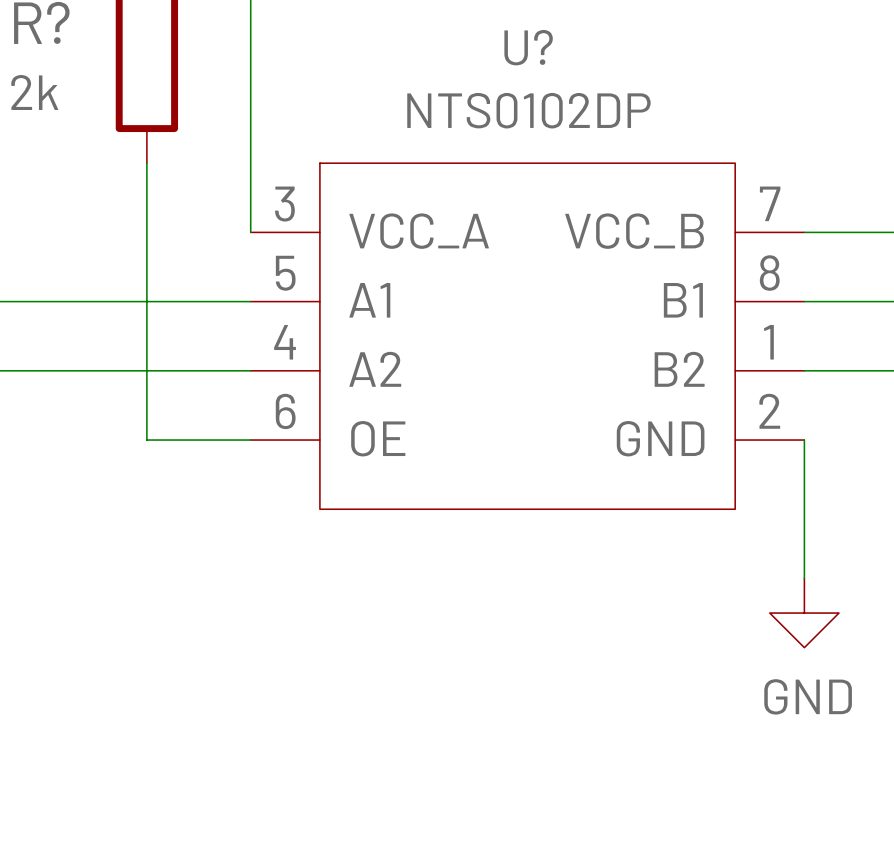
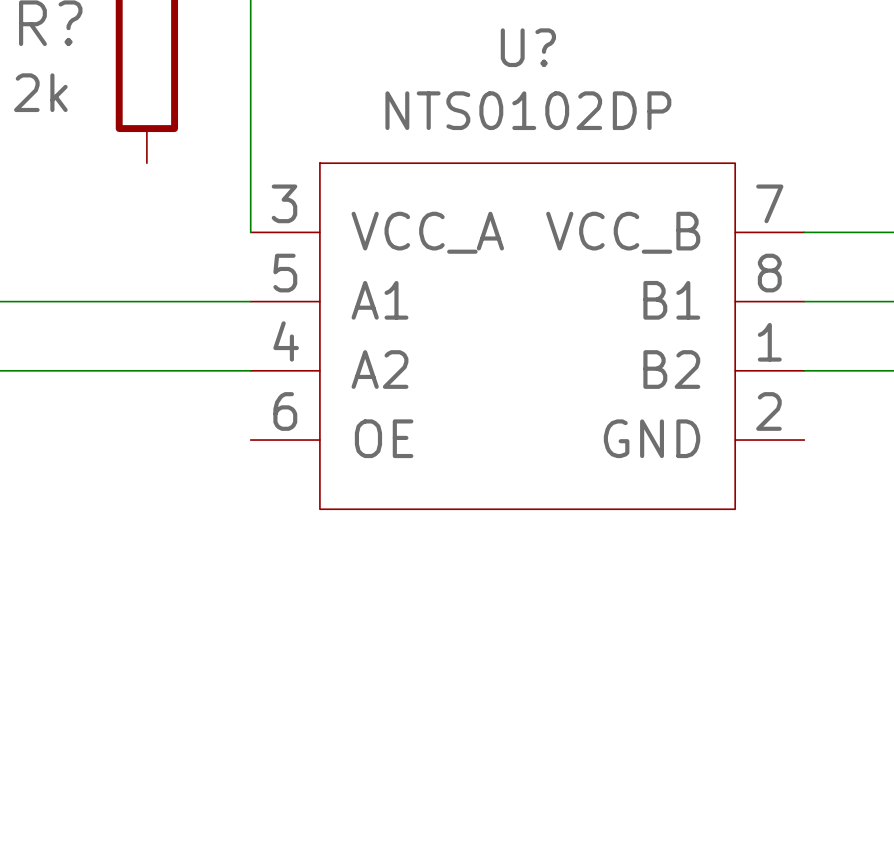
wire: (146, 163) (146, 440) (250, 440) -> none
wire: (804, 440) (804, 578) -> none
power symbol: GND (804, 613) -> none

